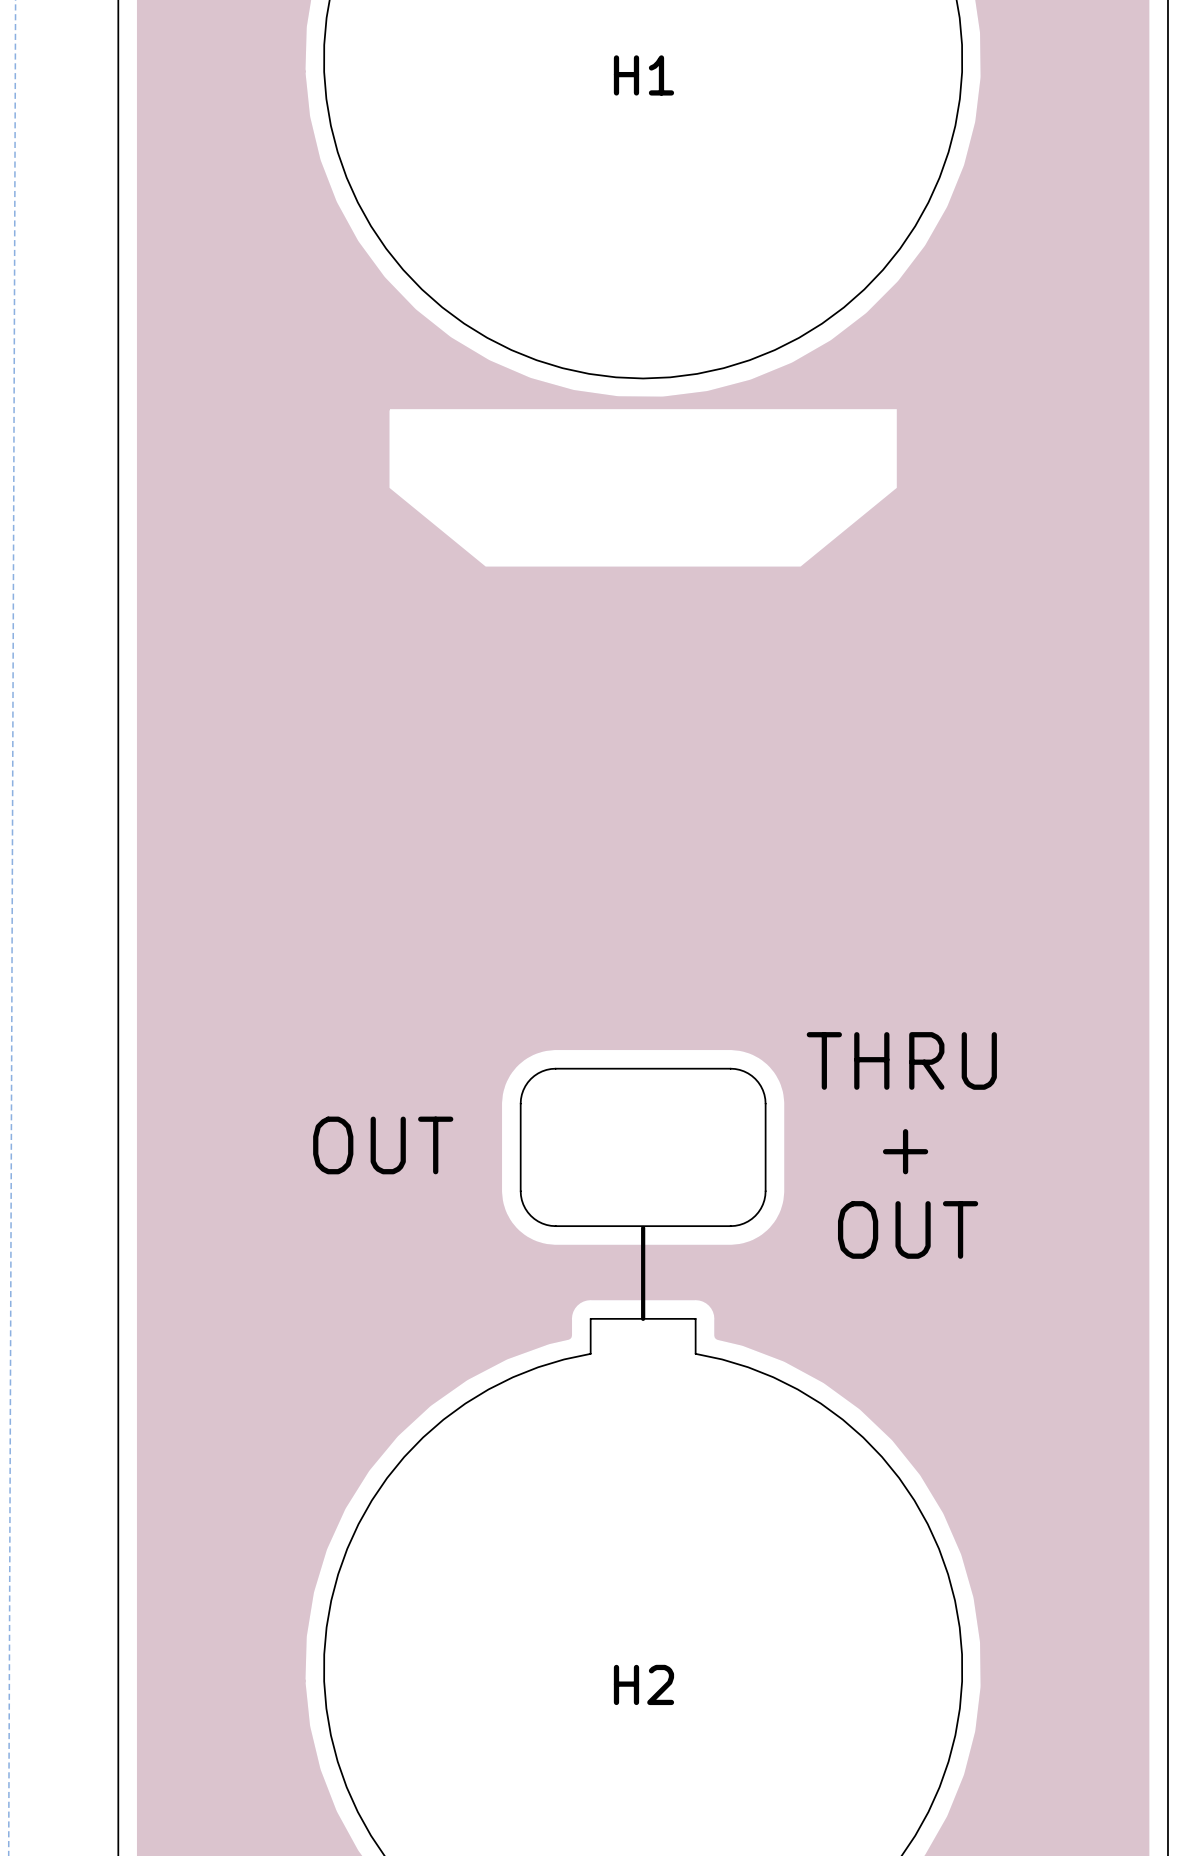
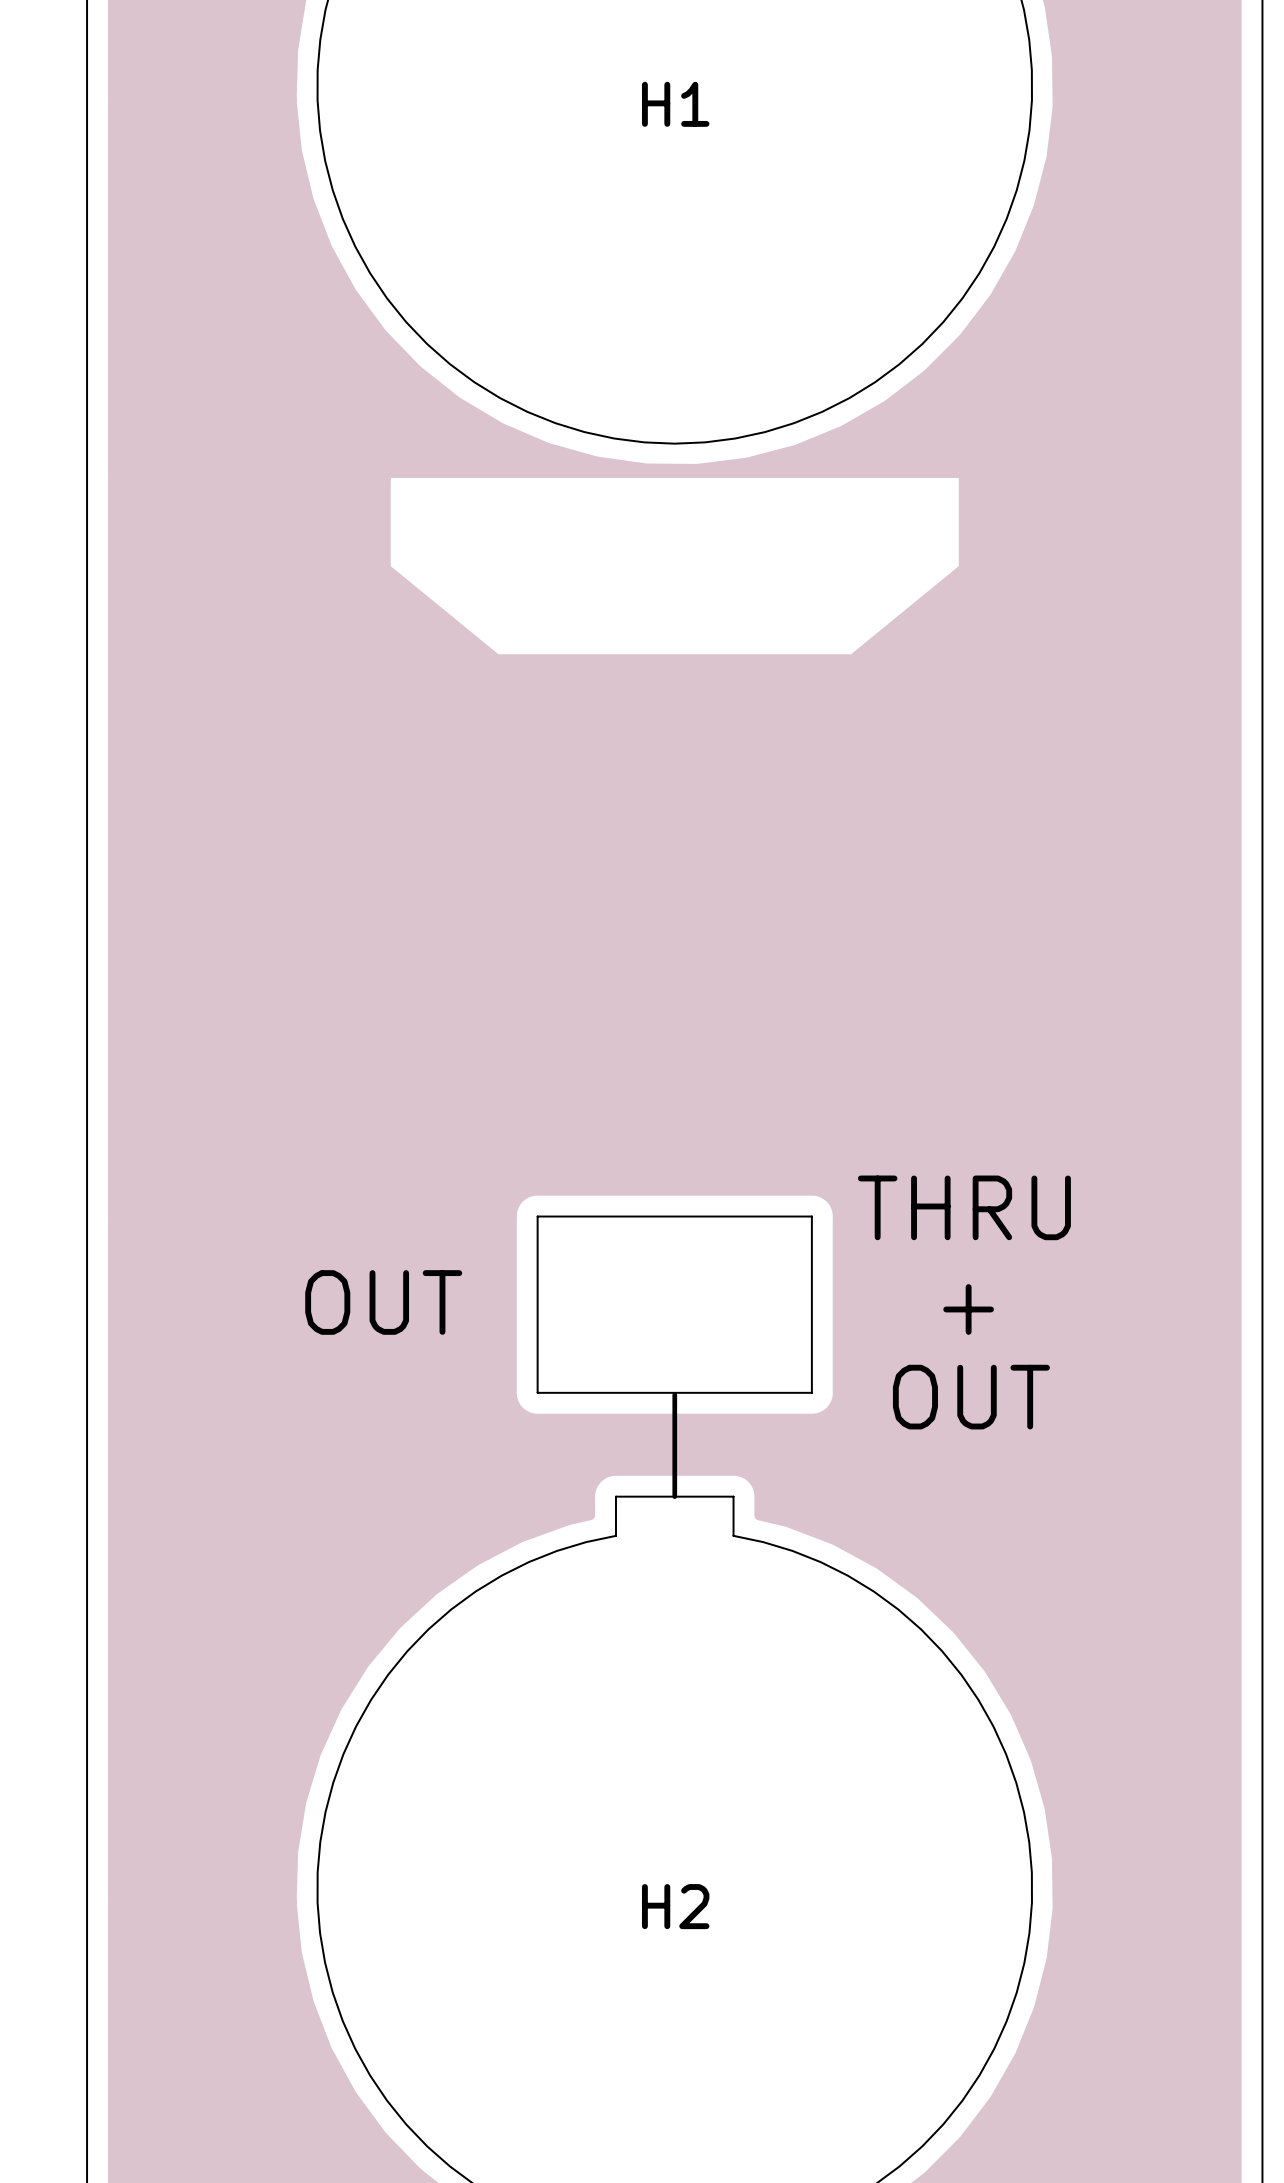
board edge: (555, 1068) (542, 1071) (530, 1078) (523, 1090) (520, 1103) -> (576, 1216) (537, 1216) (537, 1255)
board edge: (730, 1068) (744, 1071) (755, 1078) (762, 1090) (765, 1103) -> (772, 1216) (811, 1216) (811, 1255)
board edge: (520, 1191) (523, 1204) (530, 1215) (542, 1223) (555, 1226) -> (537, 1353) (537, 1392) (576, 1392)
board edge: (765, 1191) (762, 1204) (755, 1215) (744, 1223) (730, 1226) -> (811, 1353) (811, 1392) (772, 1392)

